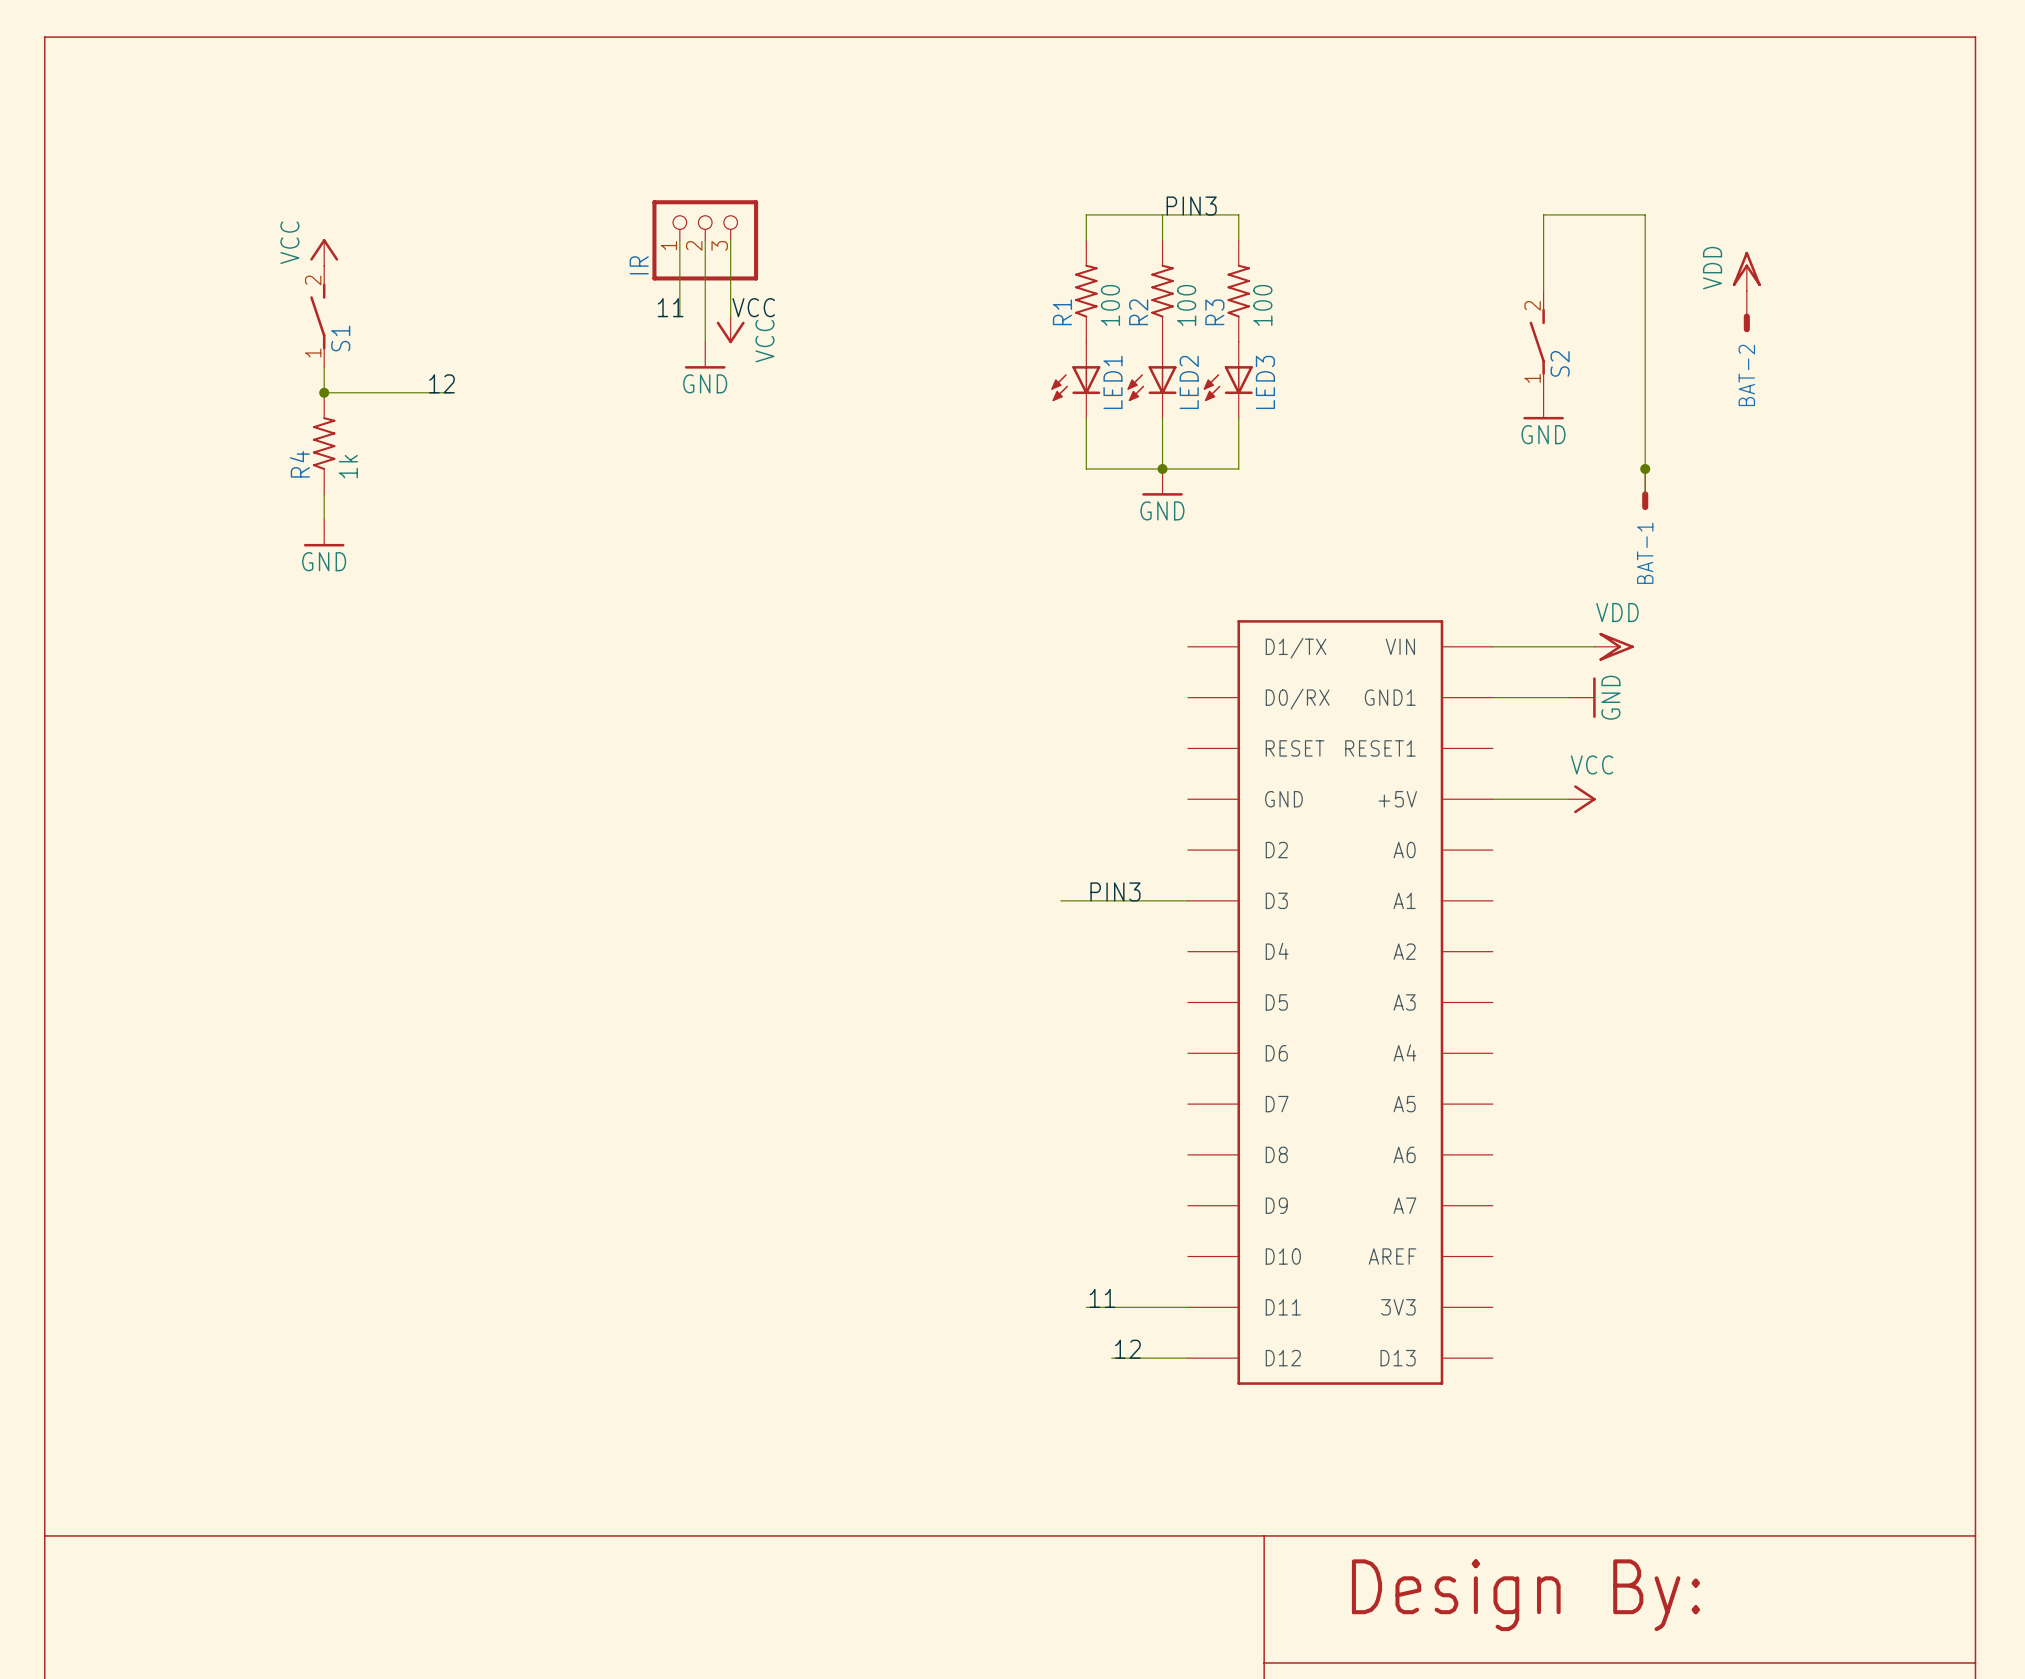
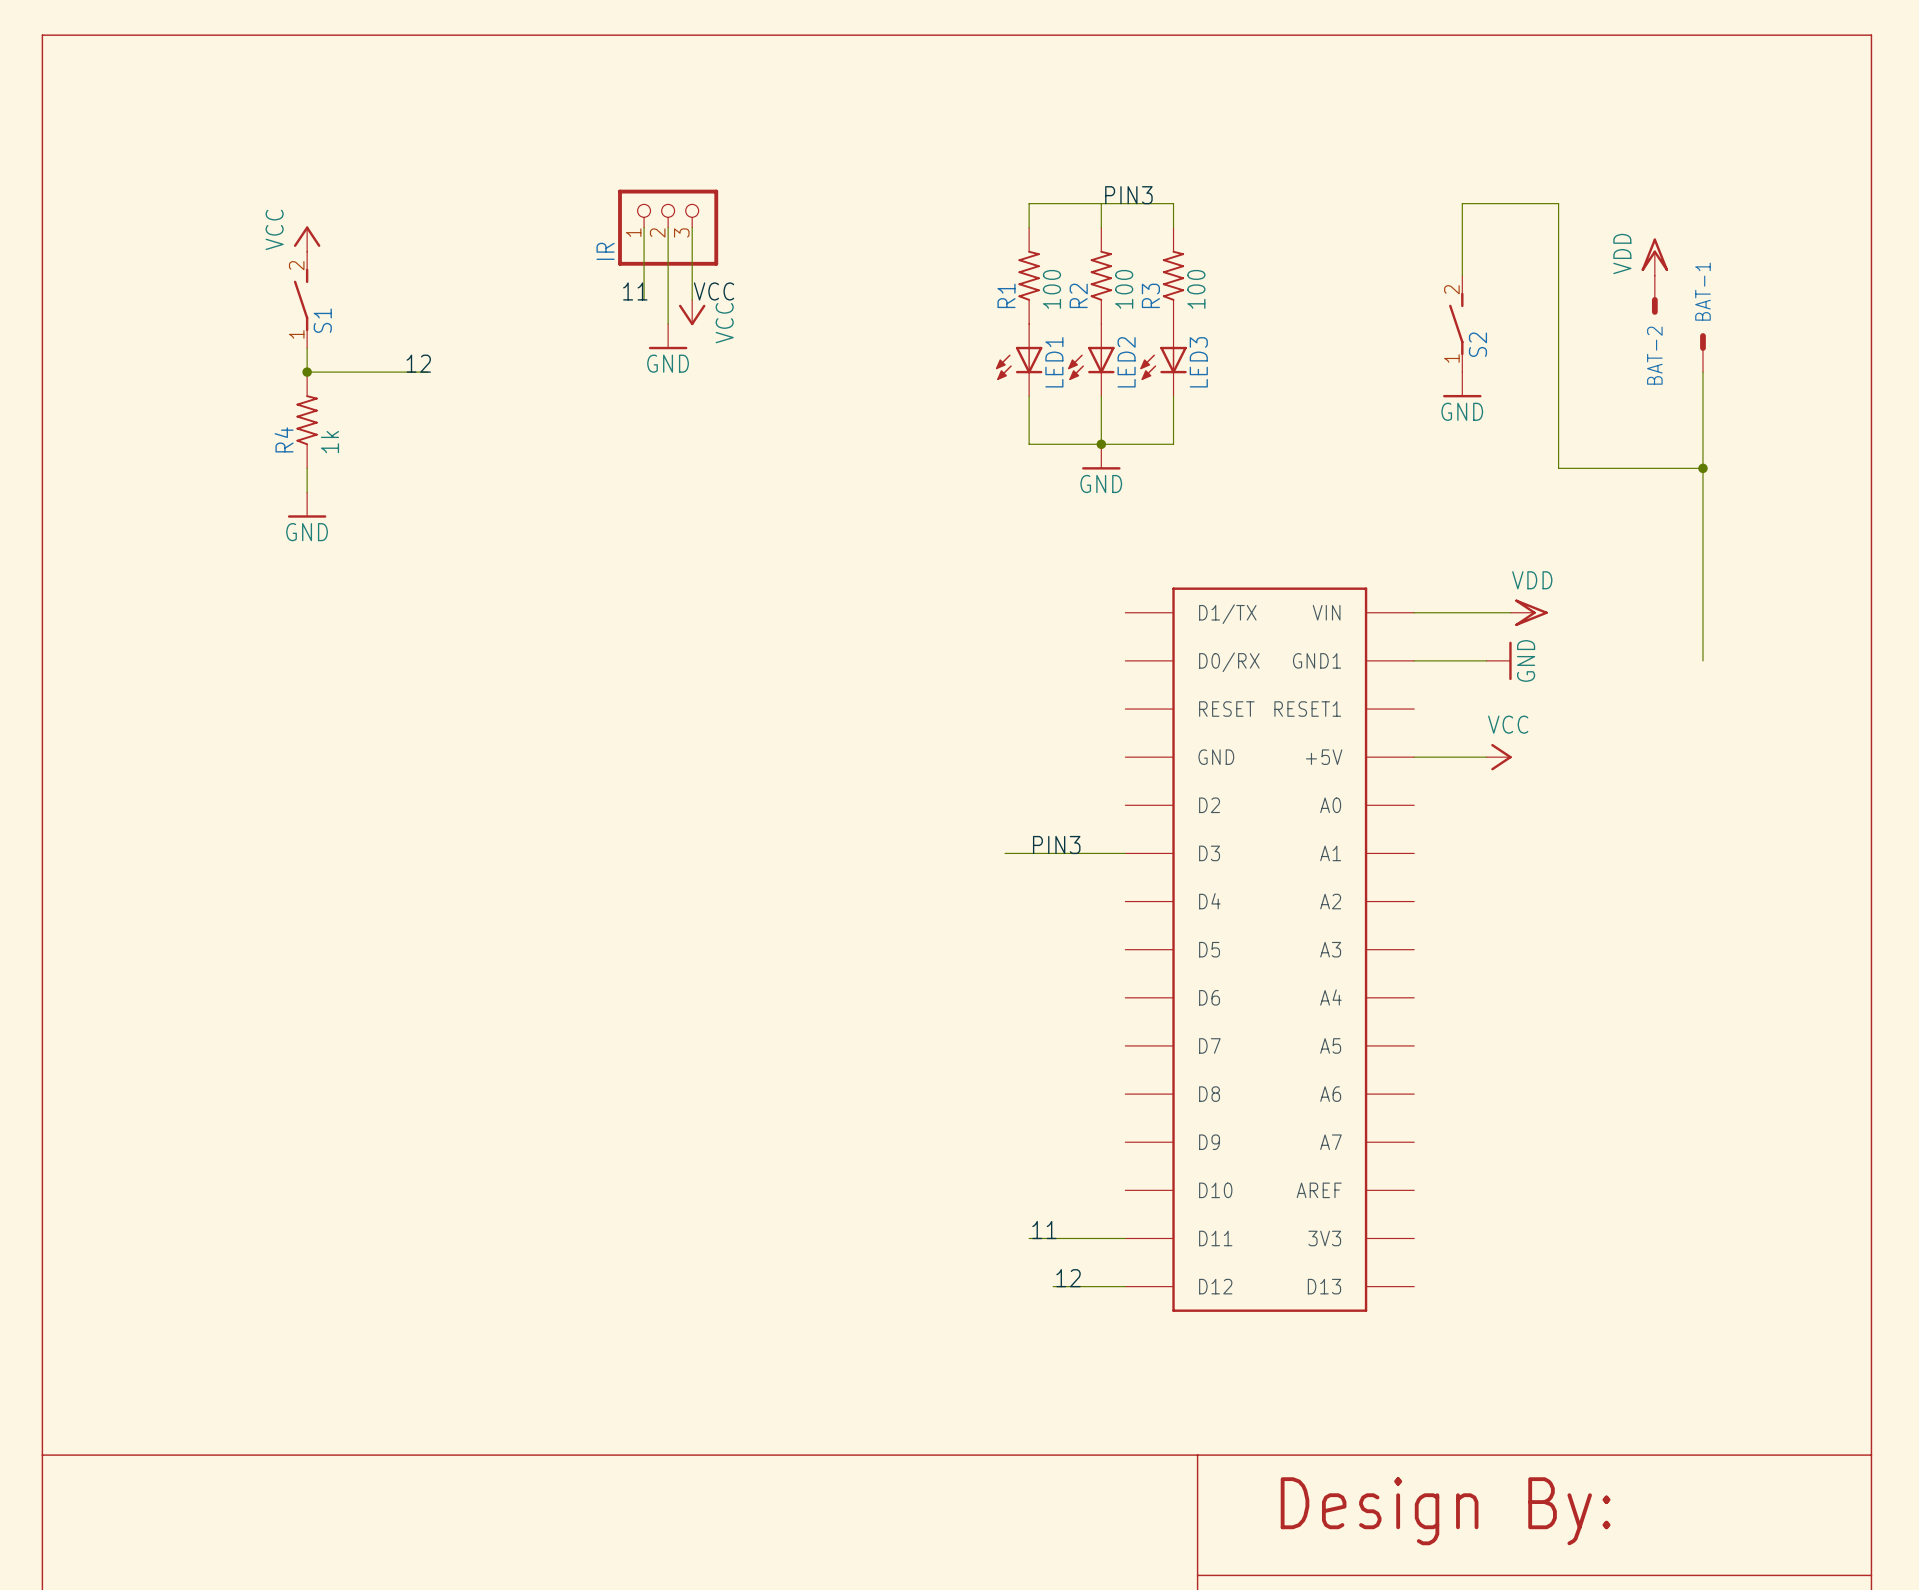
wire: none -> (1702, 372) (1702, 660)
junction: (1645, 468) -> none
BAT-1 position: (1645, 489) -> (1702, 352)
wire: none -> (1558, 468) (1702, 468)
junction: none -> (1702, 468)
BAT-1 rotation: 0° (1645, 500) -> 180° (1702, 342)

